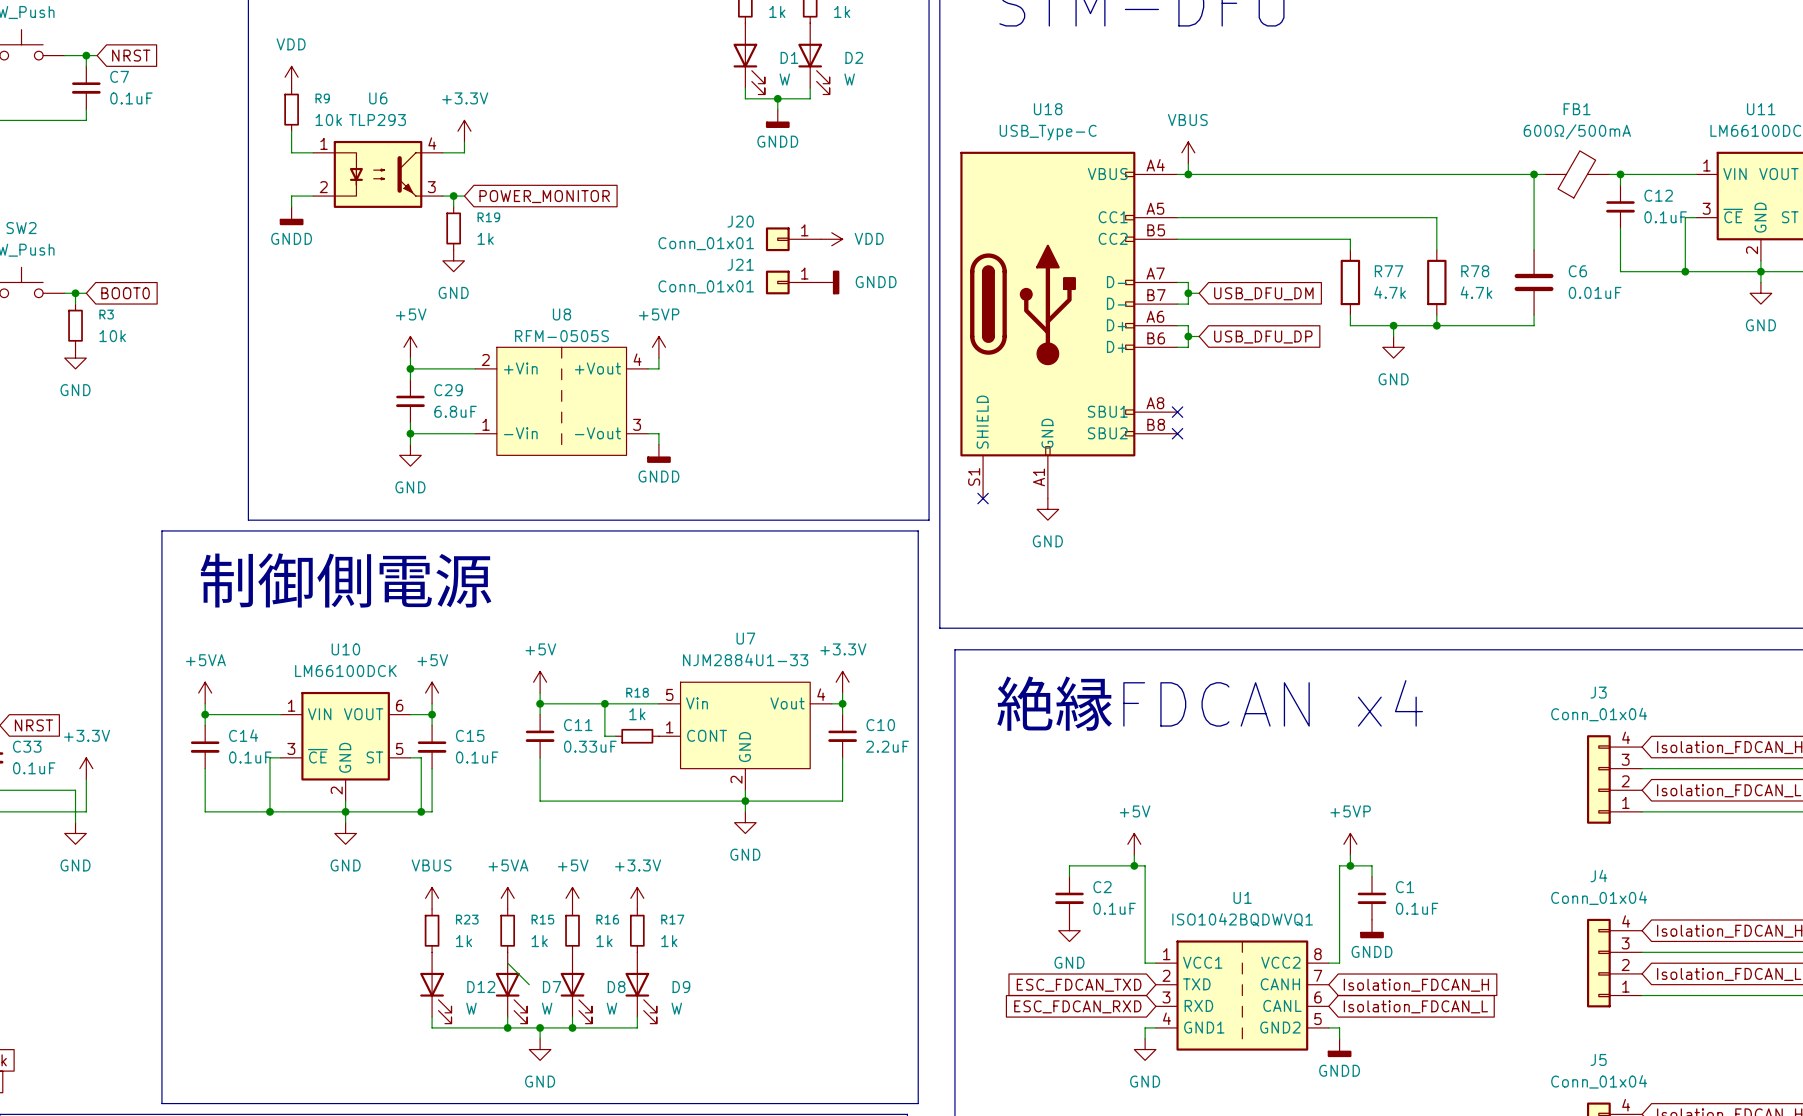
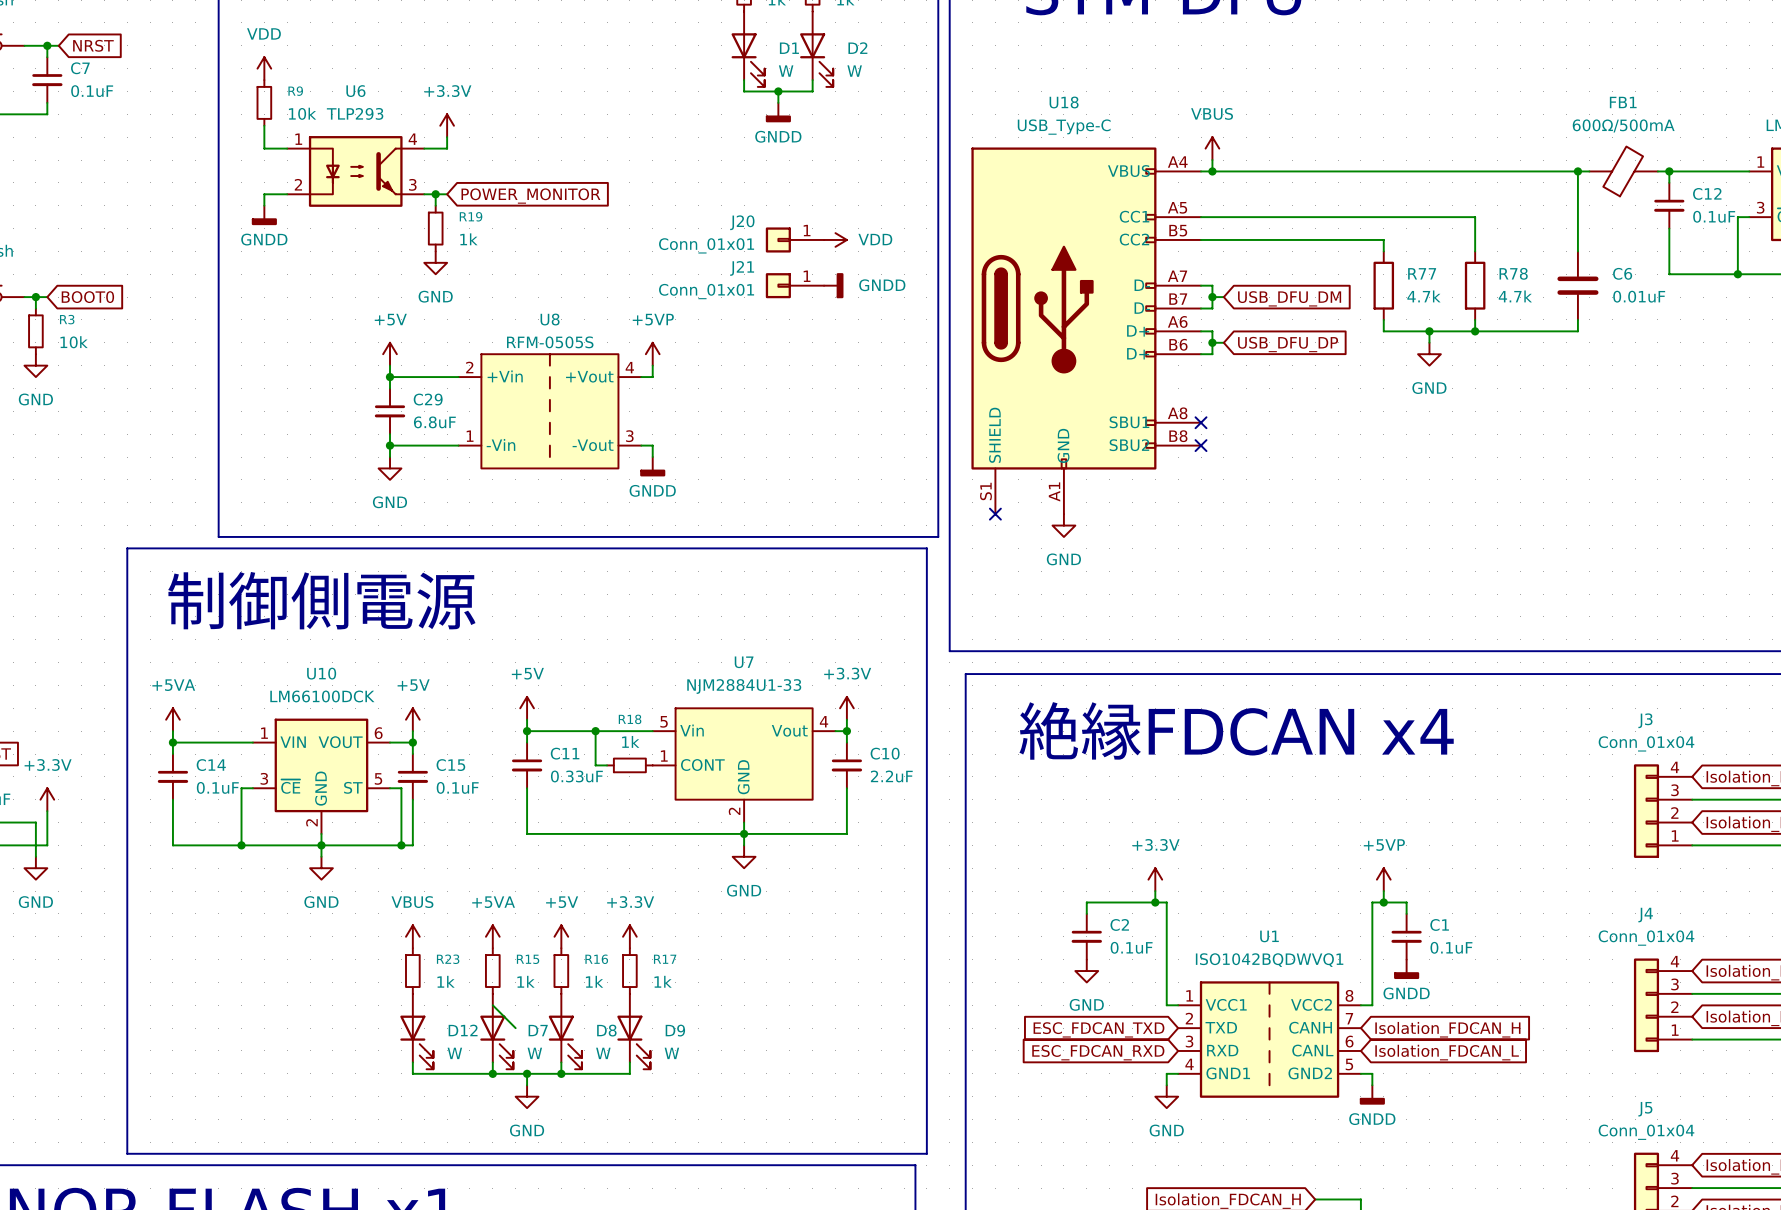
power symbol: +5V (1134, 844) -> +3.3V (1155, 879)

